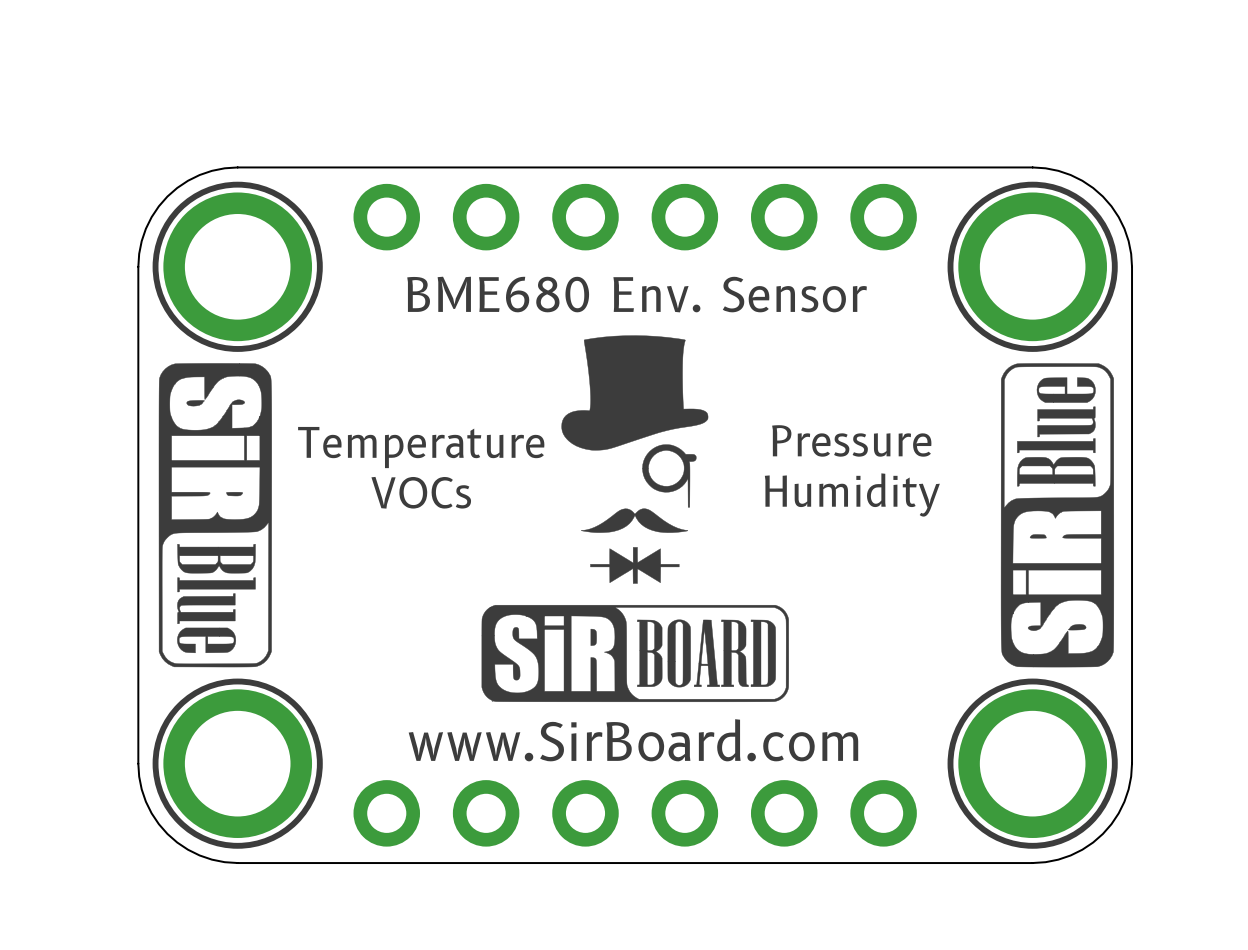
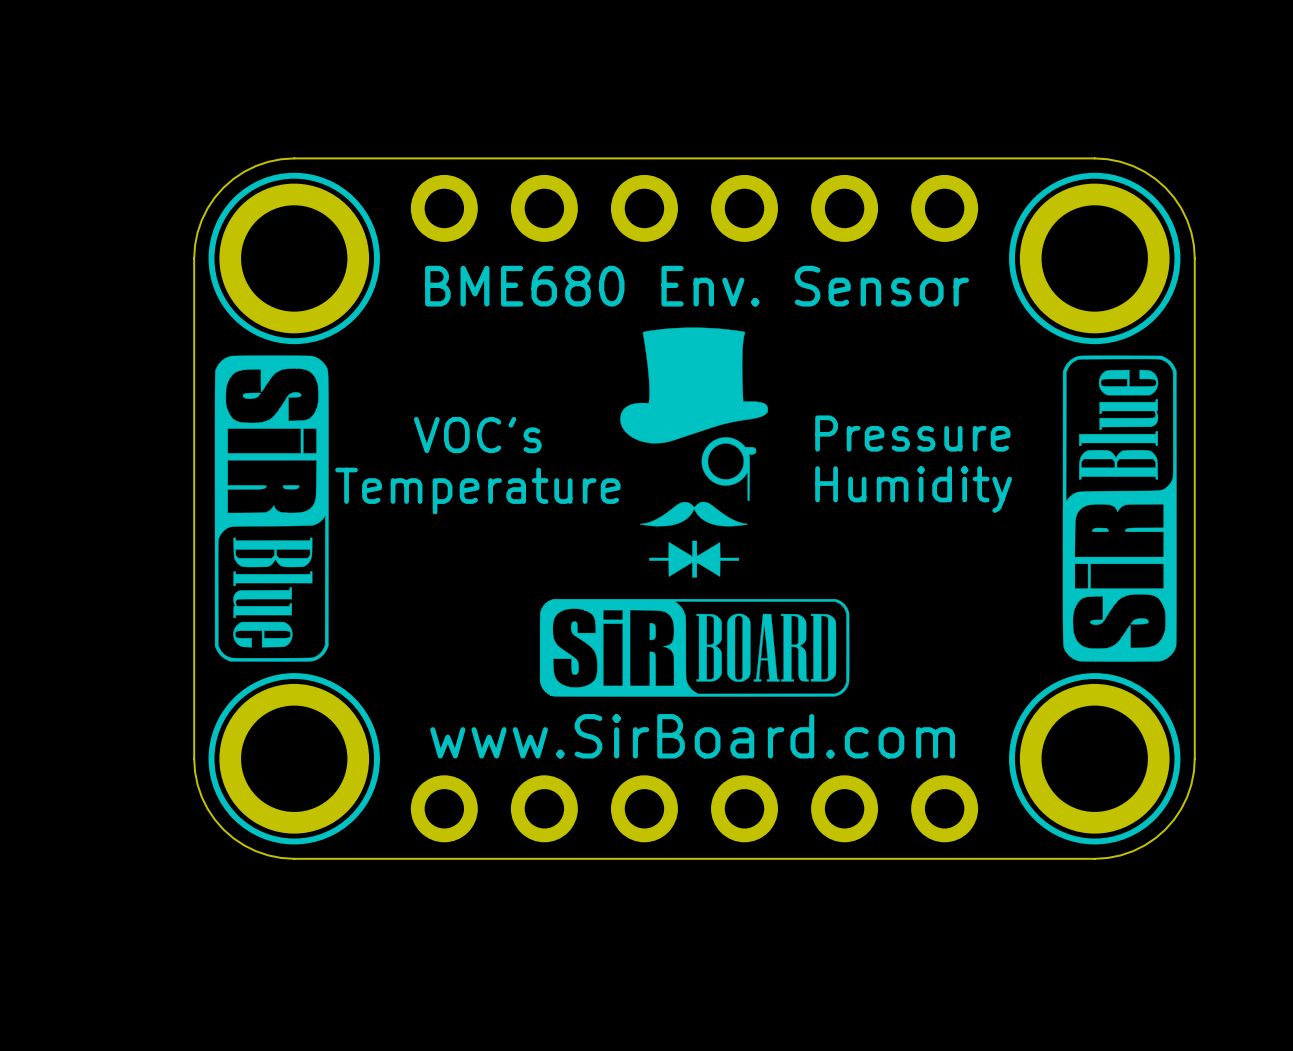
text: Temperature (421, 447) -> VOC's (477, 435)
text: VOCs (421, 492) -> Temperature (477, 491)

